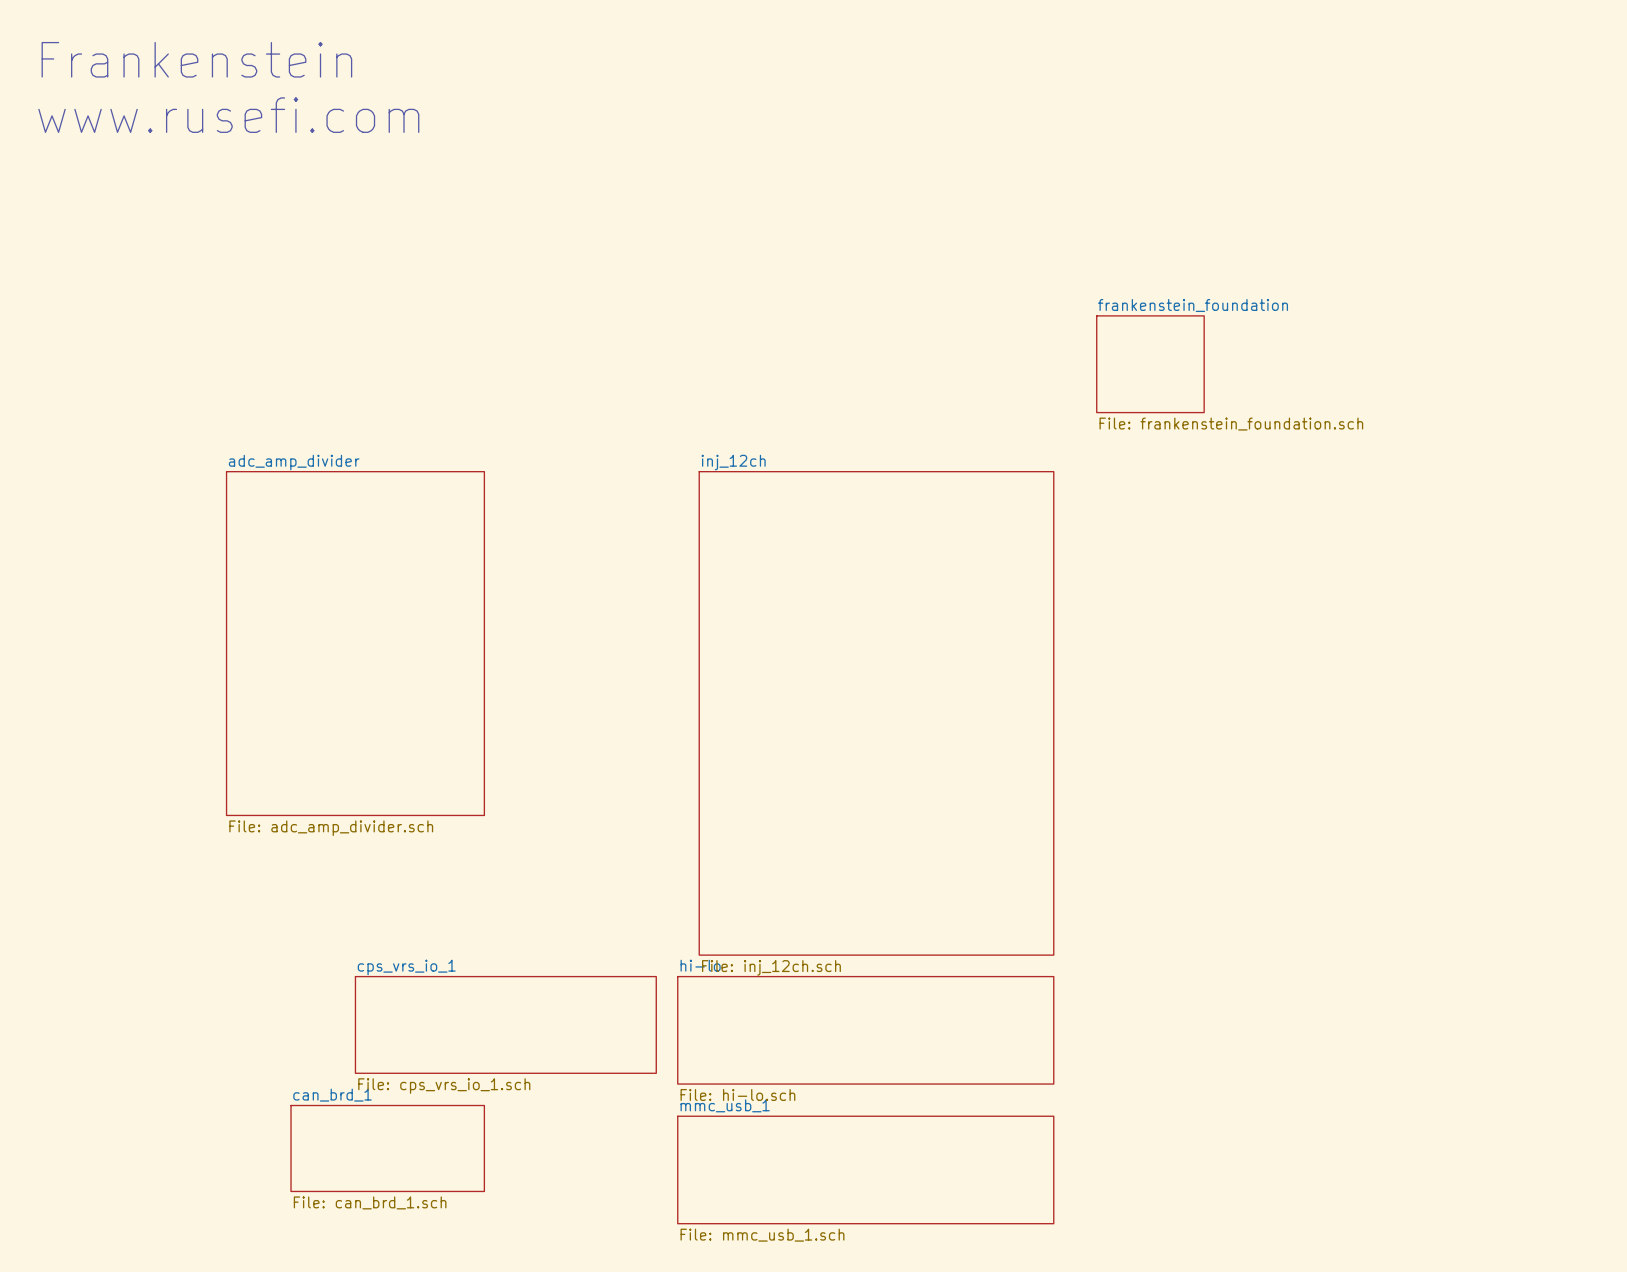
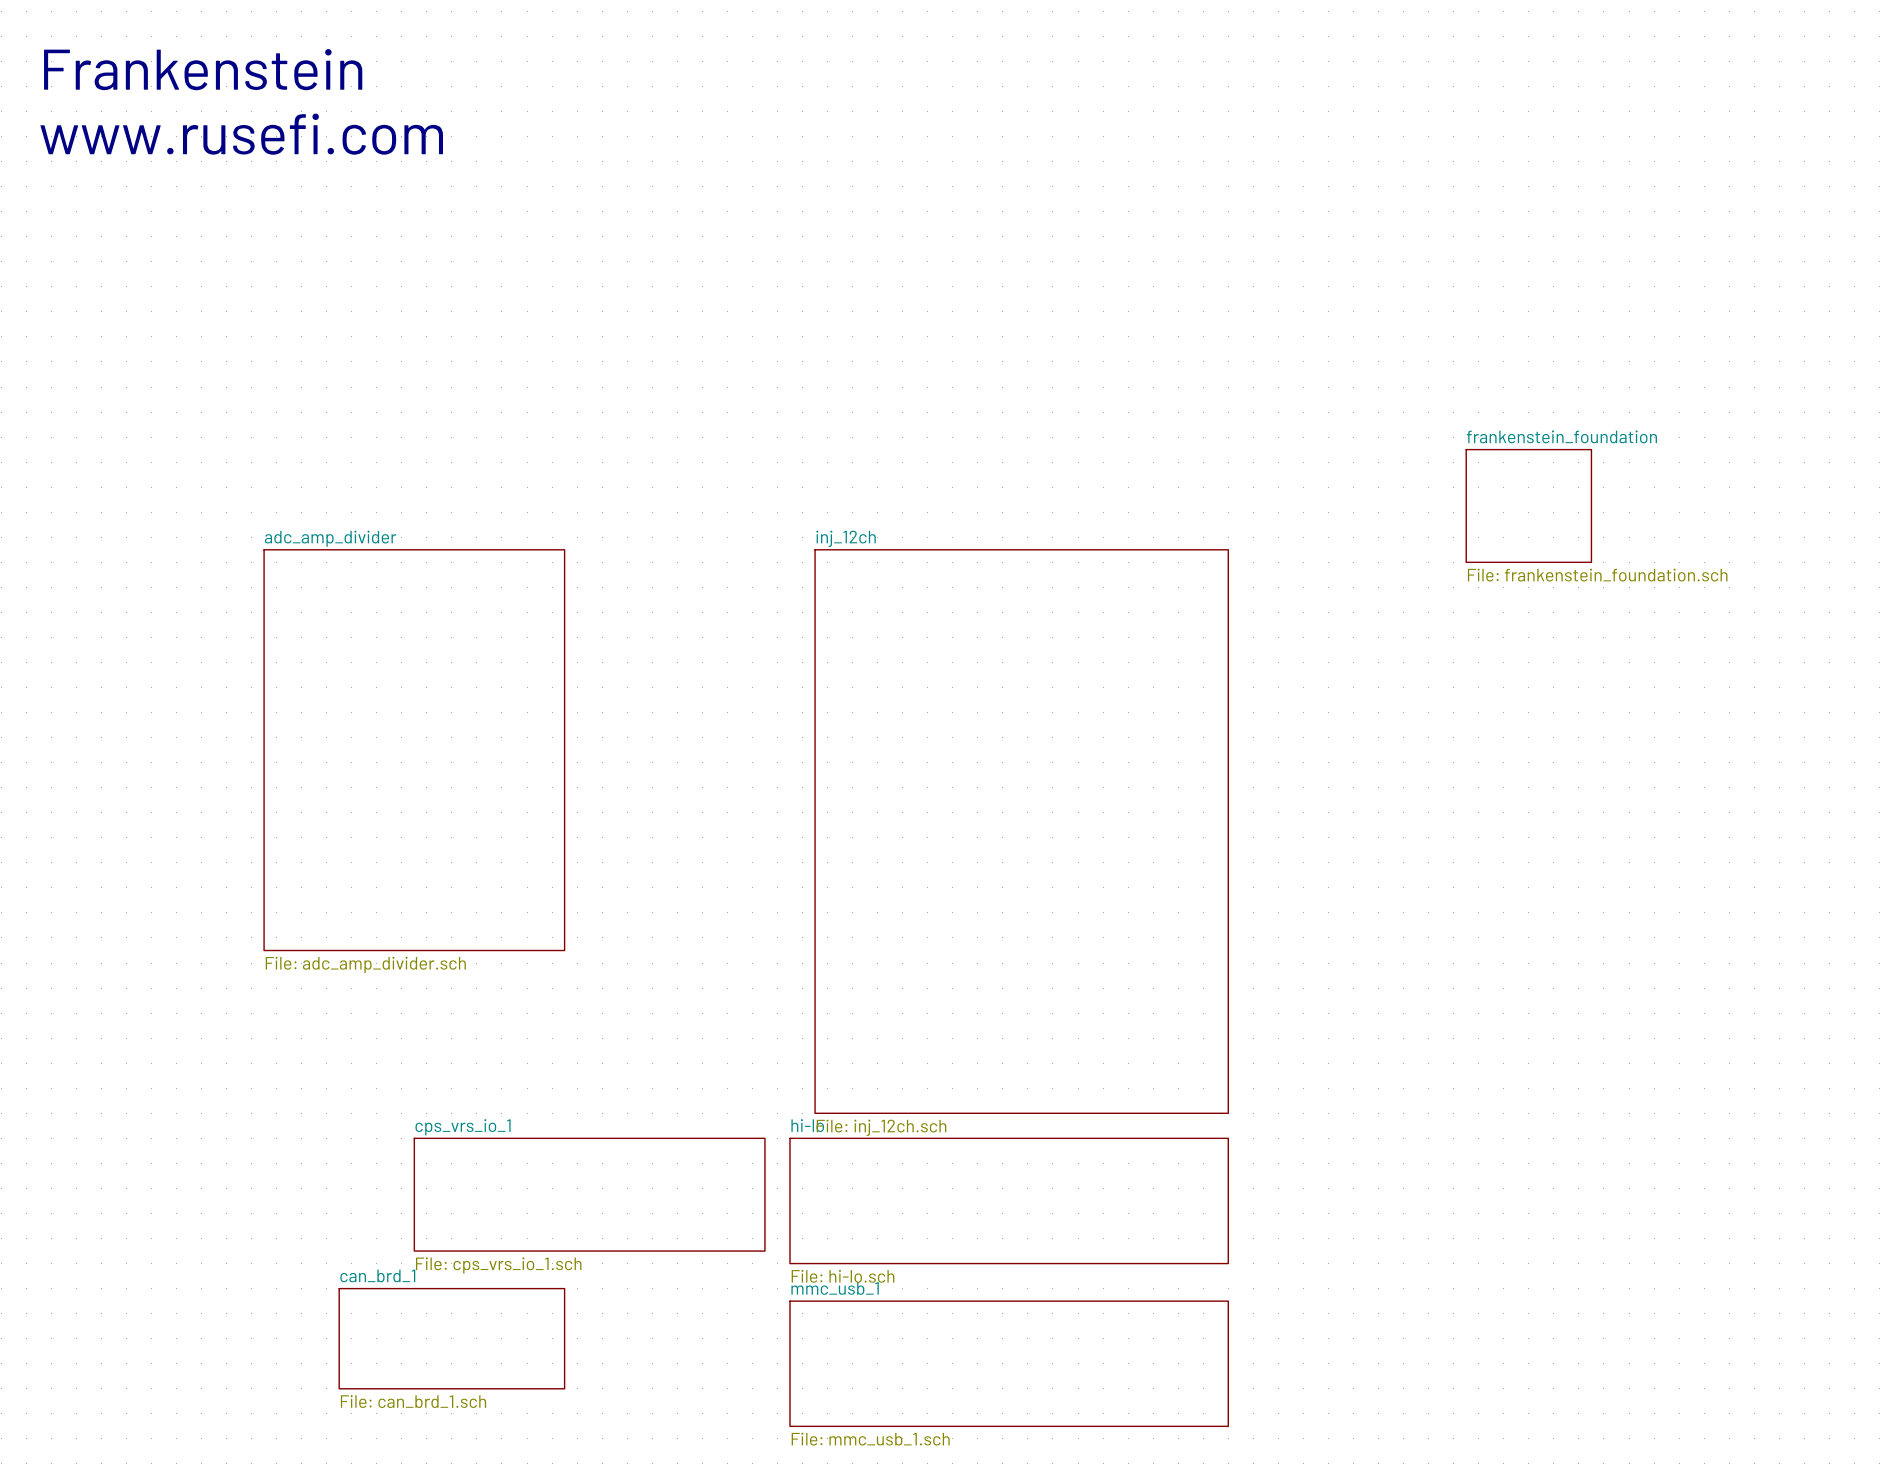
sheet frankenstein_foundation position: (1150, 364) -> (1528, 505)

